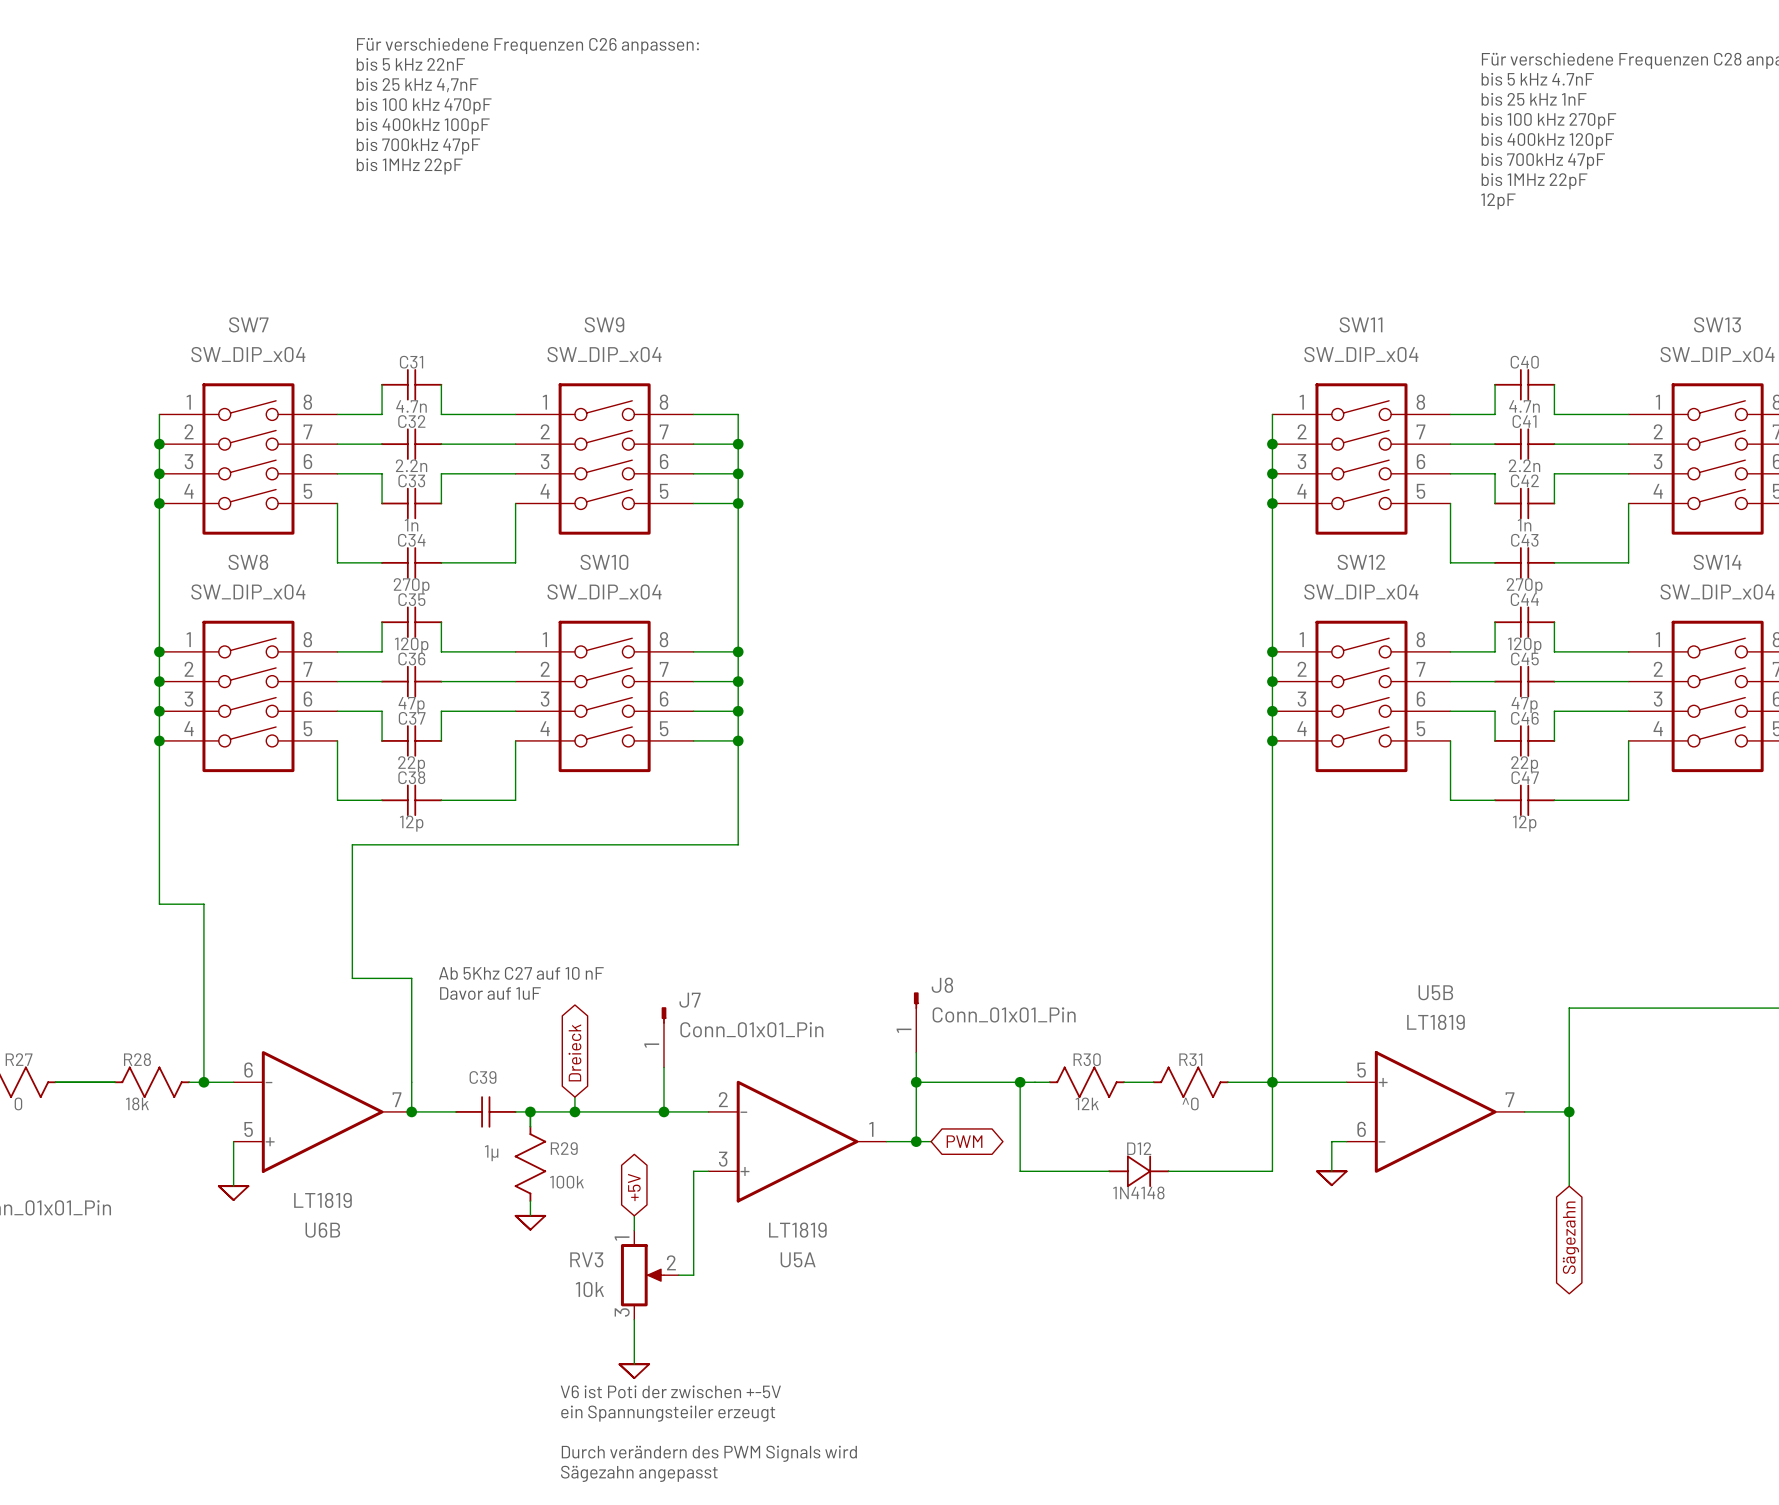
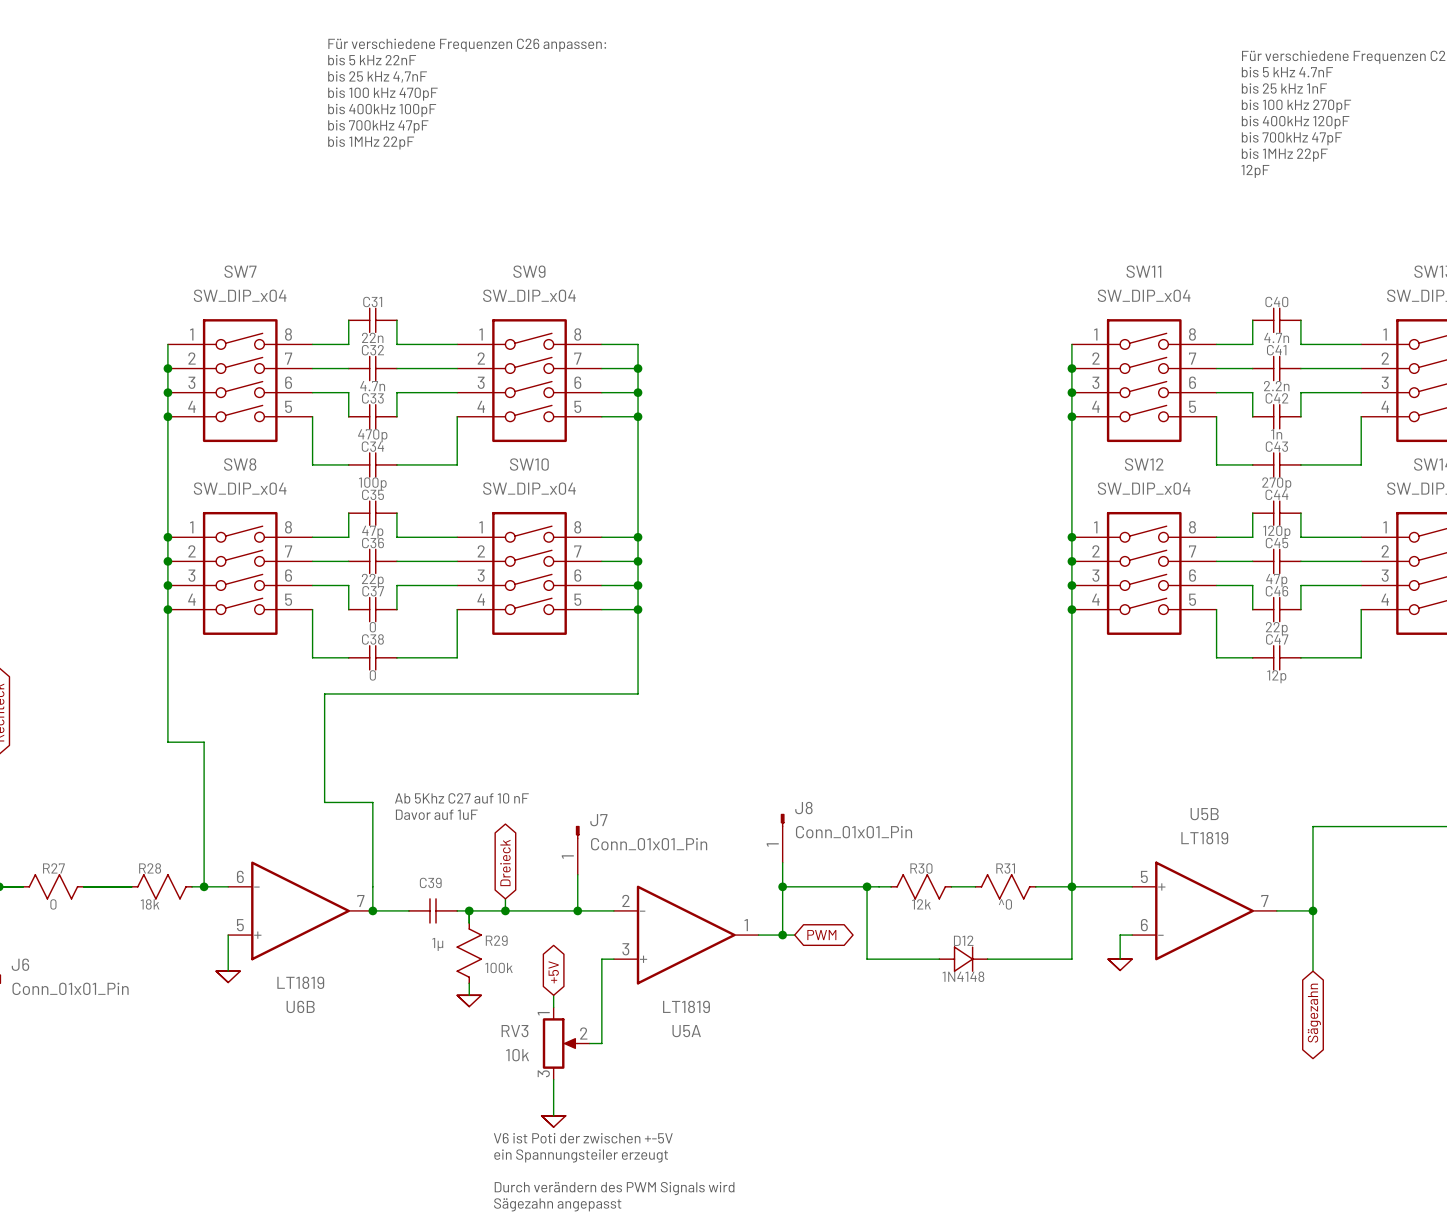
C31 value: 4.7n (411, 406) -> 22n (372, 337)
C32 value: 2.2n (411, 465) -> 4.7n (372, 386)
C33 value: 1n (411, 525) -> 470p (372, 435)
C34 value: 270p (411, 586) -> 100p (372, 483)
C35 value: 120p (411, 645) -> 47p (372, 532)
C36 value: 47p (411, 704) -> 22p (372, 580)
C37 value: 22p (411, 764) -> 0 (372, 627)
C38 value: 12p (411, 823) -> 0 (372, 675)

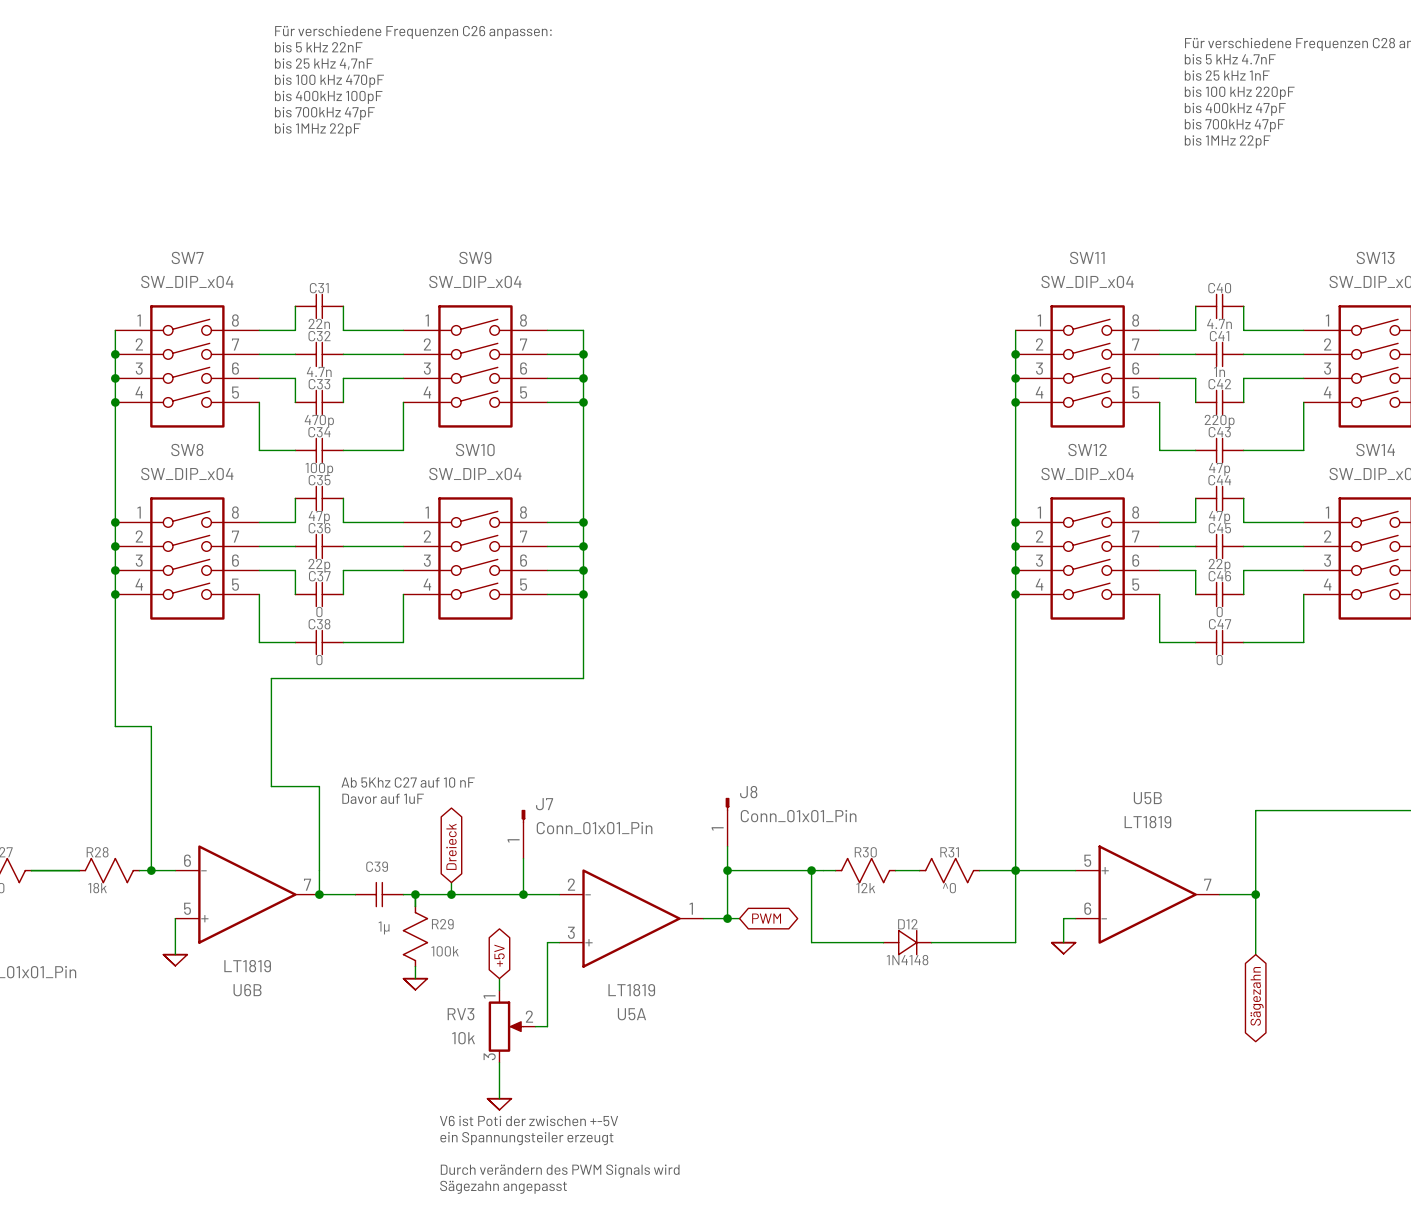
text: bis 100 kHz 270pF (1296, 106) -> bis 100 kHz 220pF (1239, 93)
text: bis 400kHz 120pF (1295, 122) -> bis 400kHz 47pF (1235, 109)
text: 12pF (1255, 171) -> none
C41 value: 2.2n (1276, 386) -> 1n (1219, 371)
C42 value: 1n (1276, 434) -> 220p (1219, 421)
C43 value: 270p (1276, 483) -> 47p (1219, 469)
C44 value: 120p (1276, 532) -> 47p (1219, 517)
C45 value: 47p (1276, 580) -> 22p (1219, 565)
C46 value: 22p (1276, 628) -> 0 (1219, 612)
C47 value: 12p (1276, 676) -> 0 (1219, 660)

